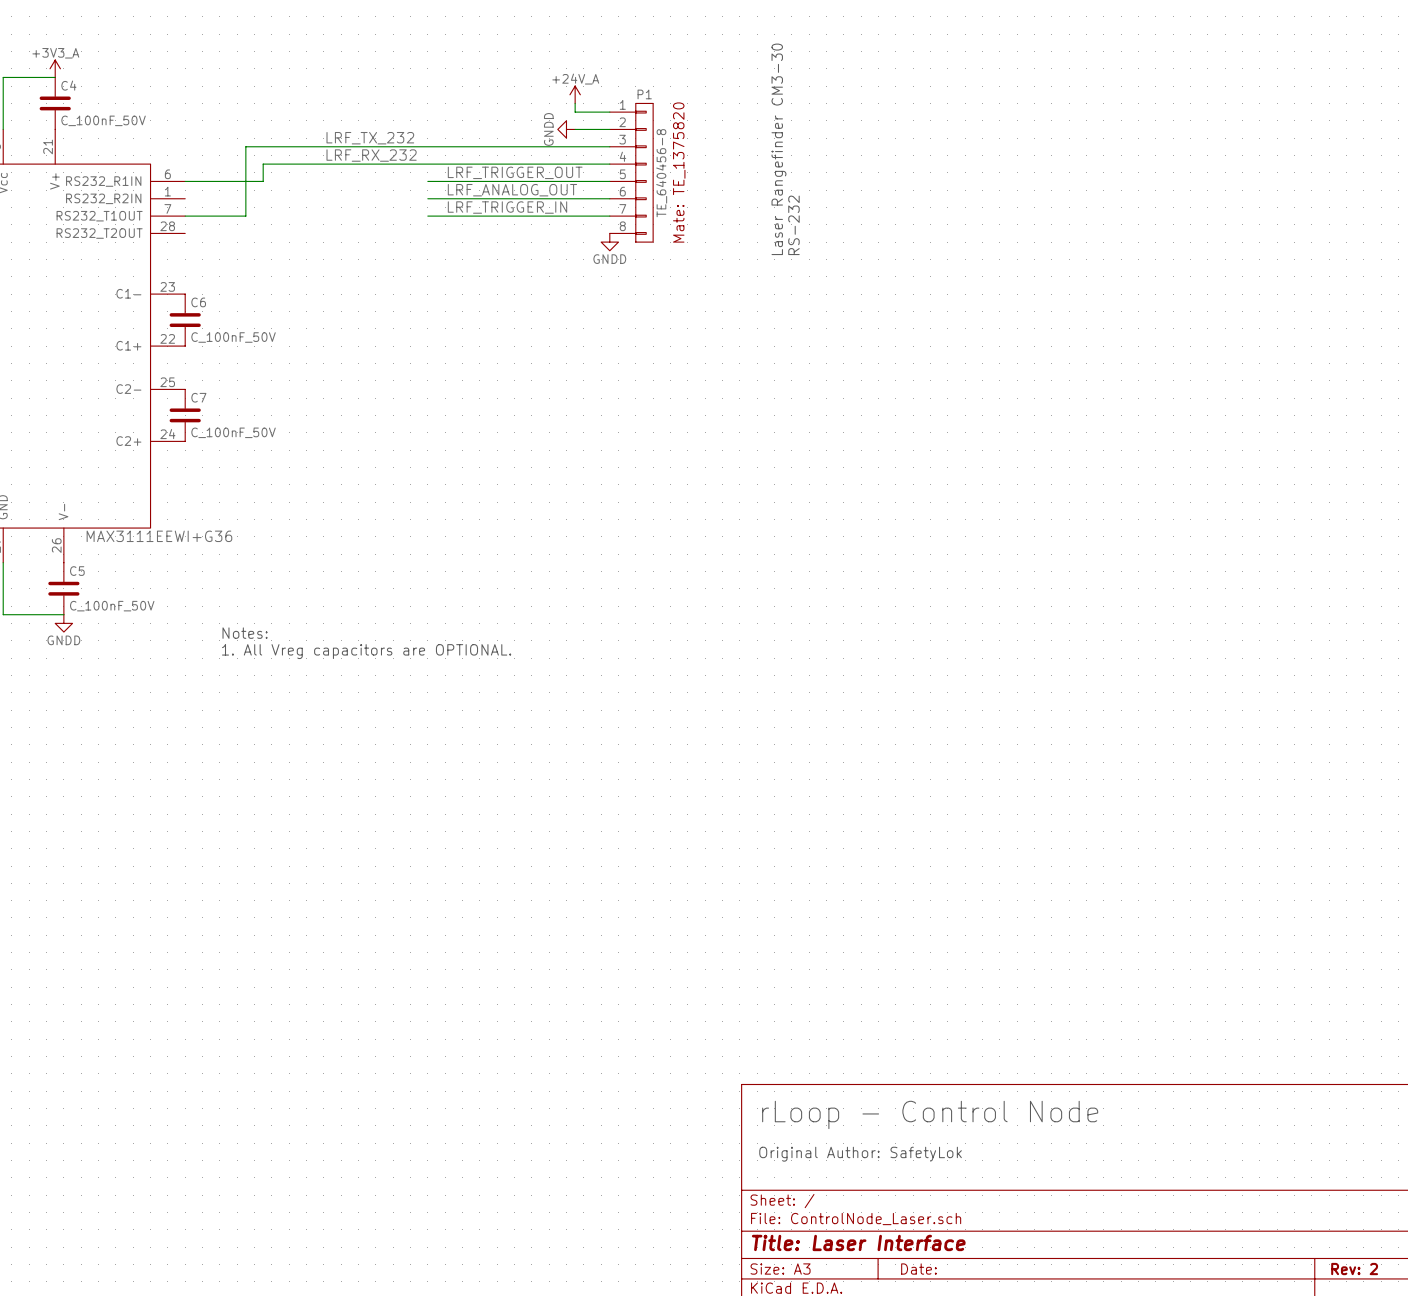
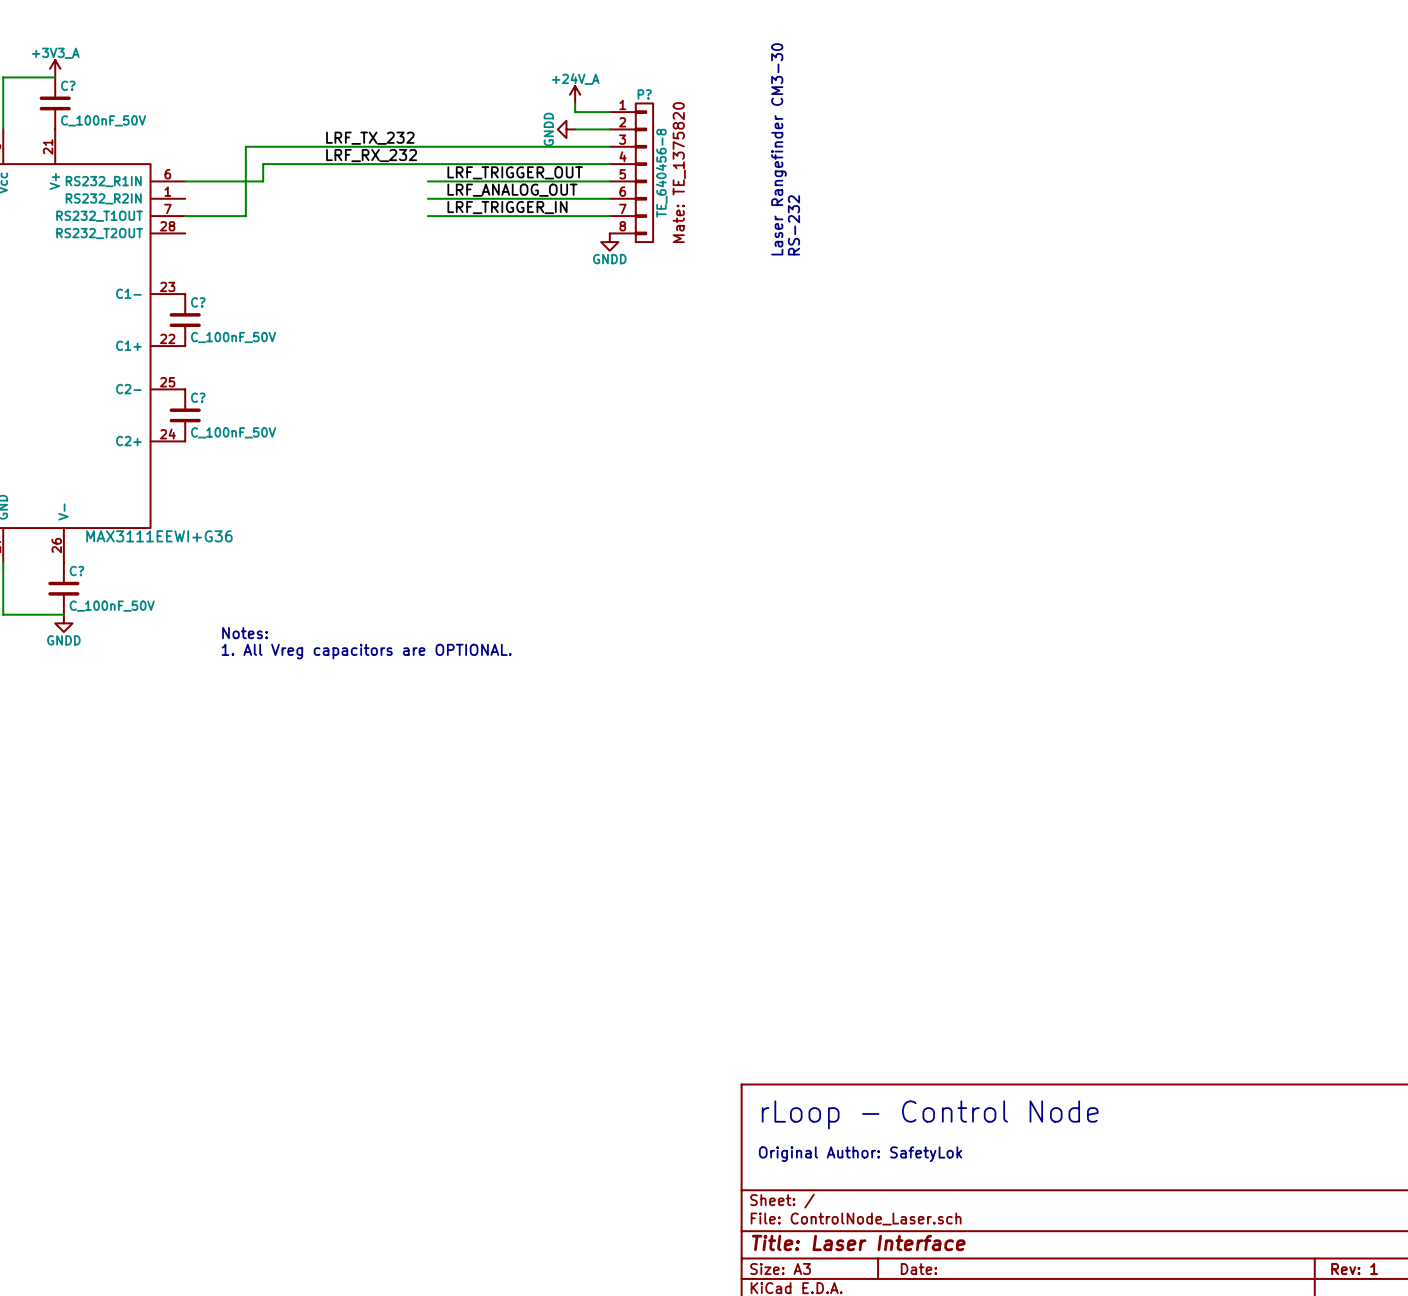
C4 name: C4 (68, 85) -> C? (68, 85)
P1 name: P1 (644, 94) -> P? (644, 94)
C6 name: C6 (198, 302) -> C? (198, 302)
C7 name: C7 (198, 397) -> C? (198, 397)
C5 name: C5 (77, 571) -> C? (76, 571)
title block: Rev: 2 (1354, 1269) -> Rev: 1 (1354, 1269)

